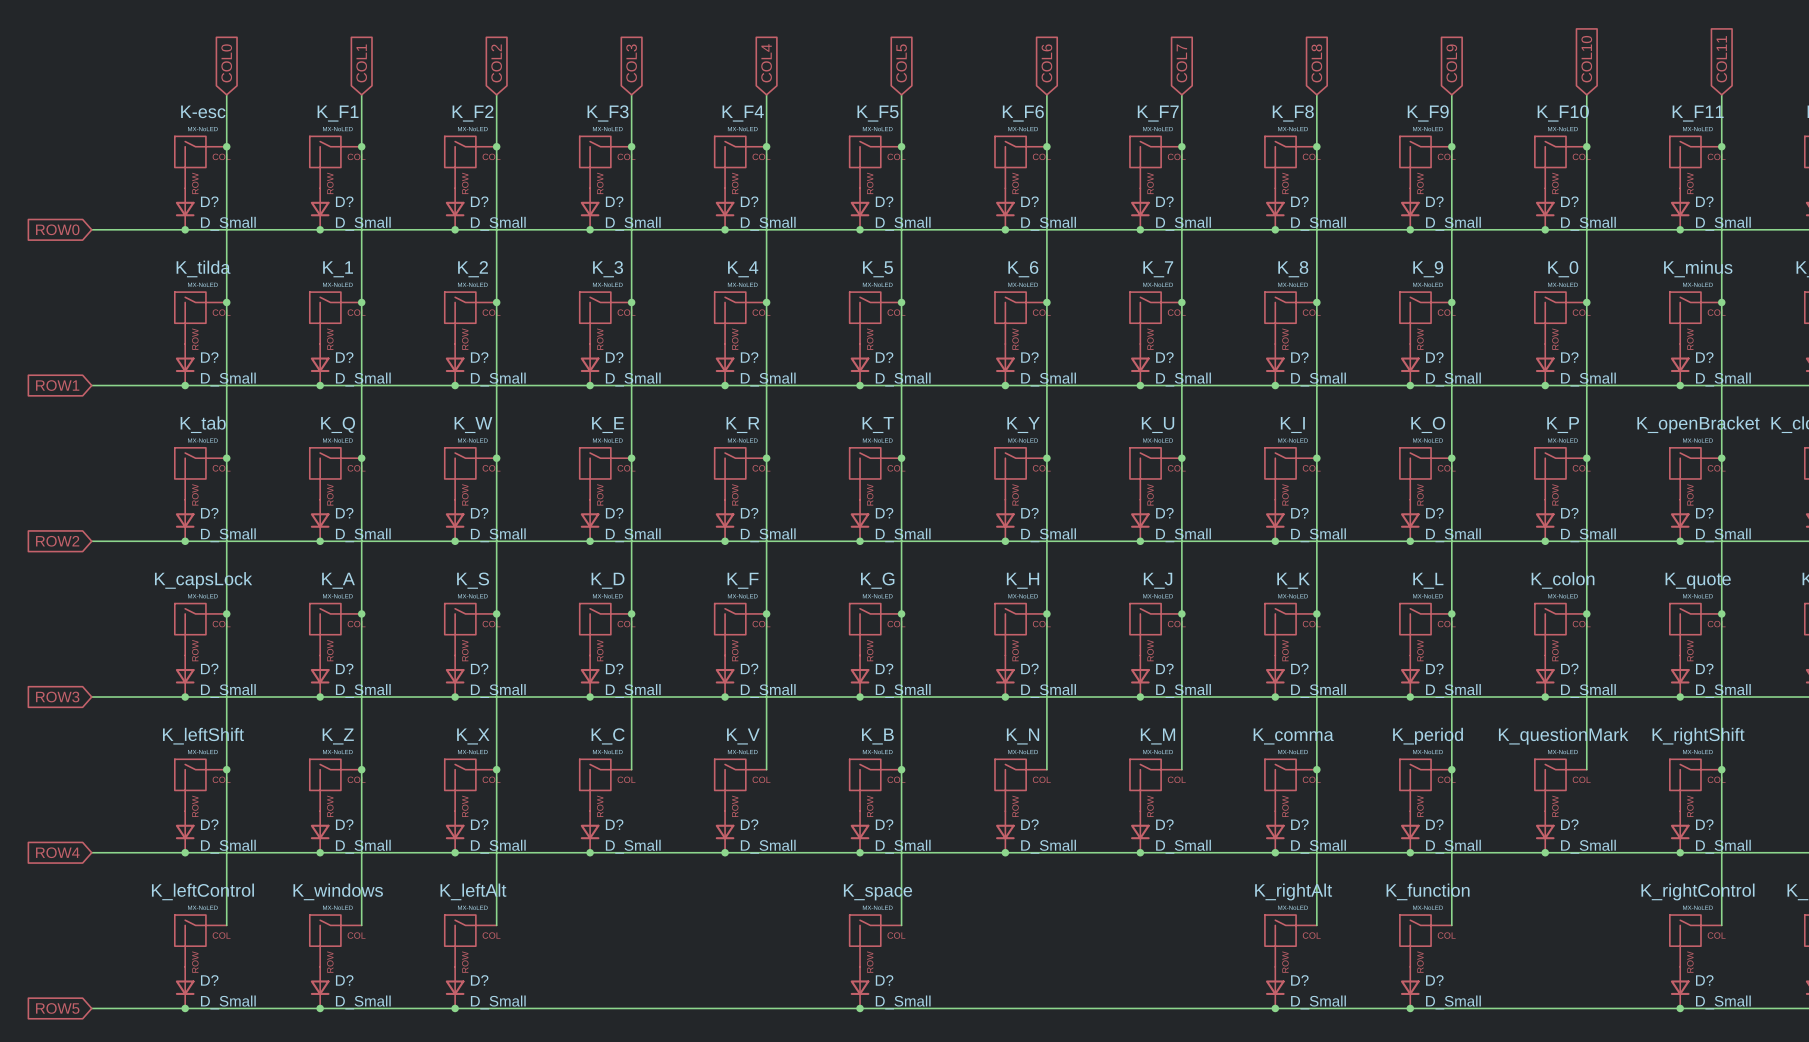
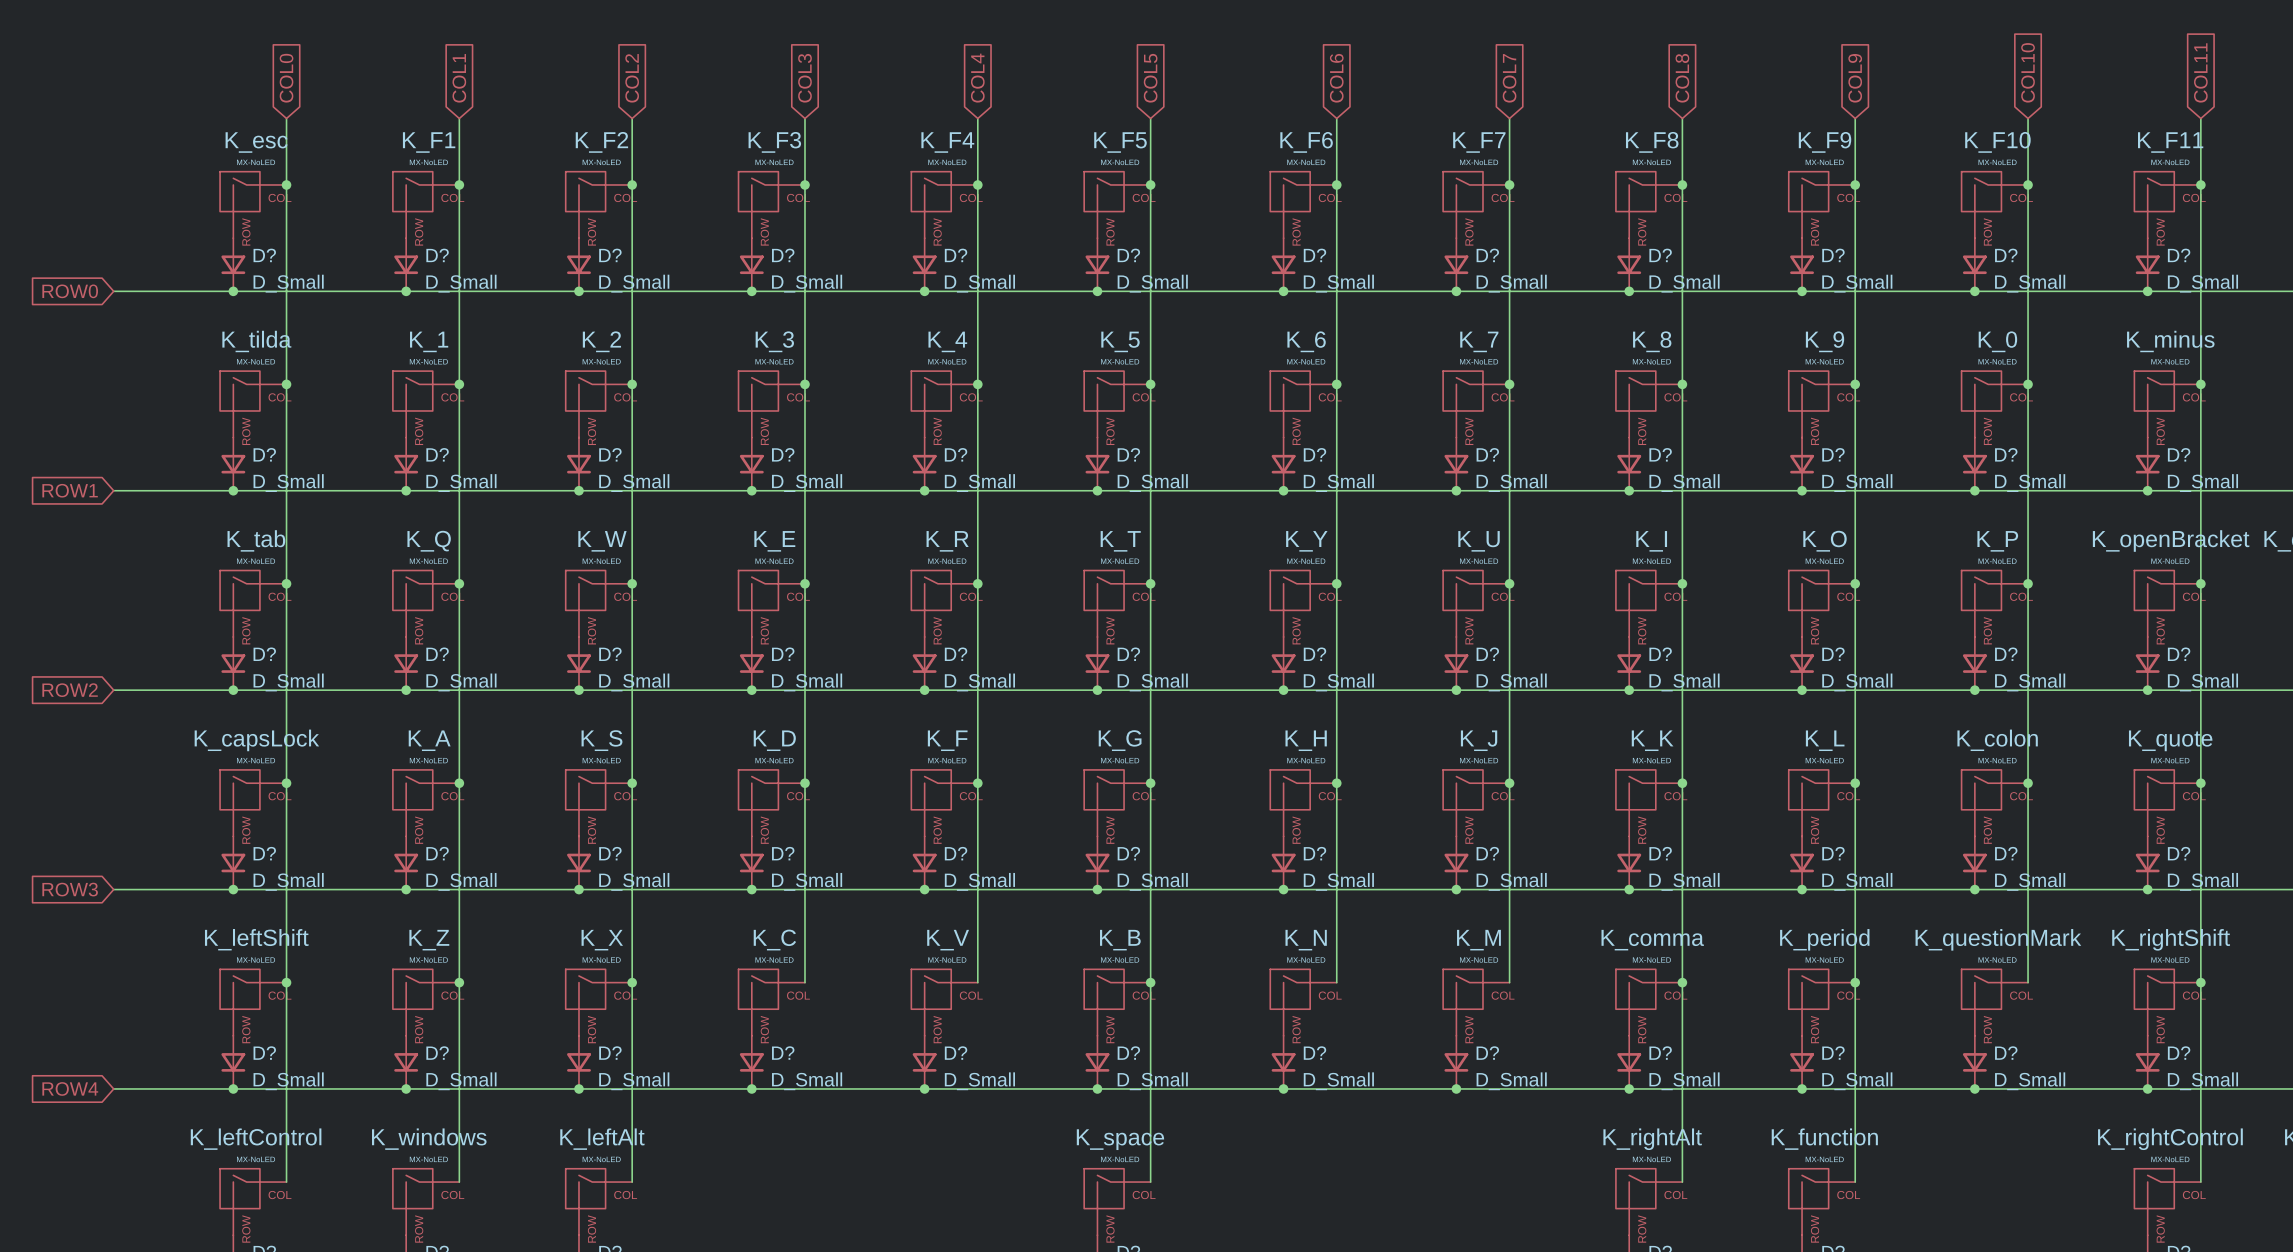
K-esc name: K-esc (203, 111) -> K_esc (256, 142)

